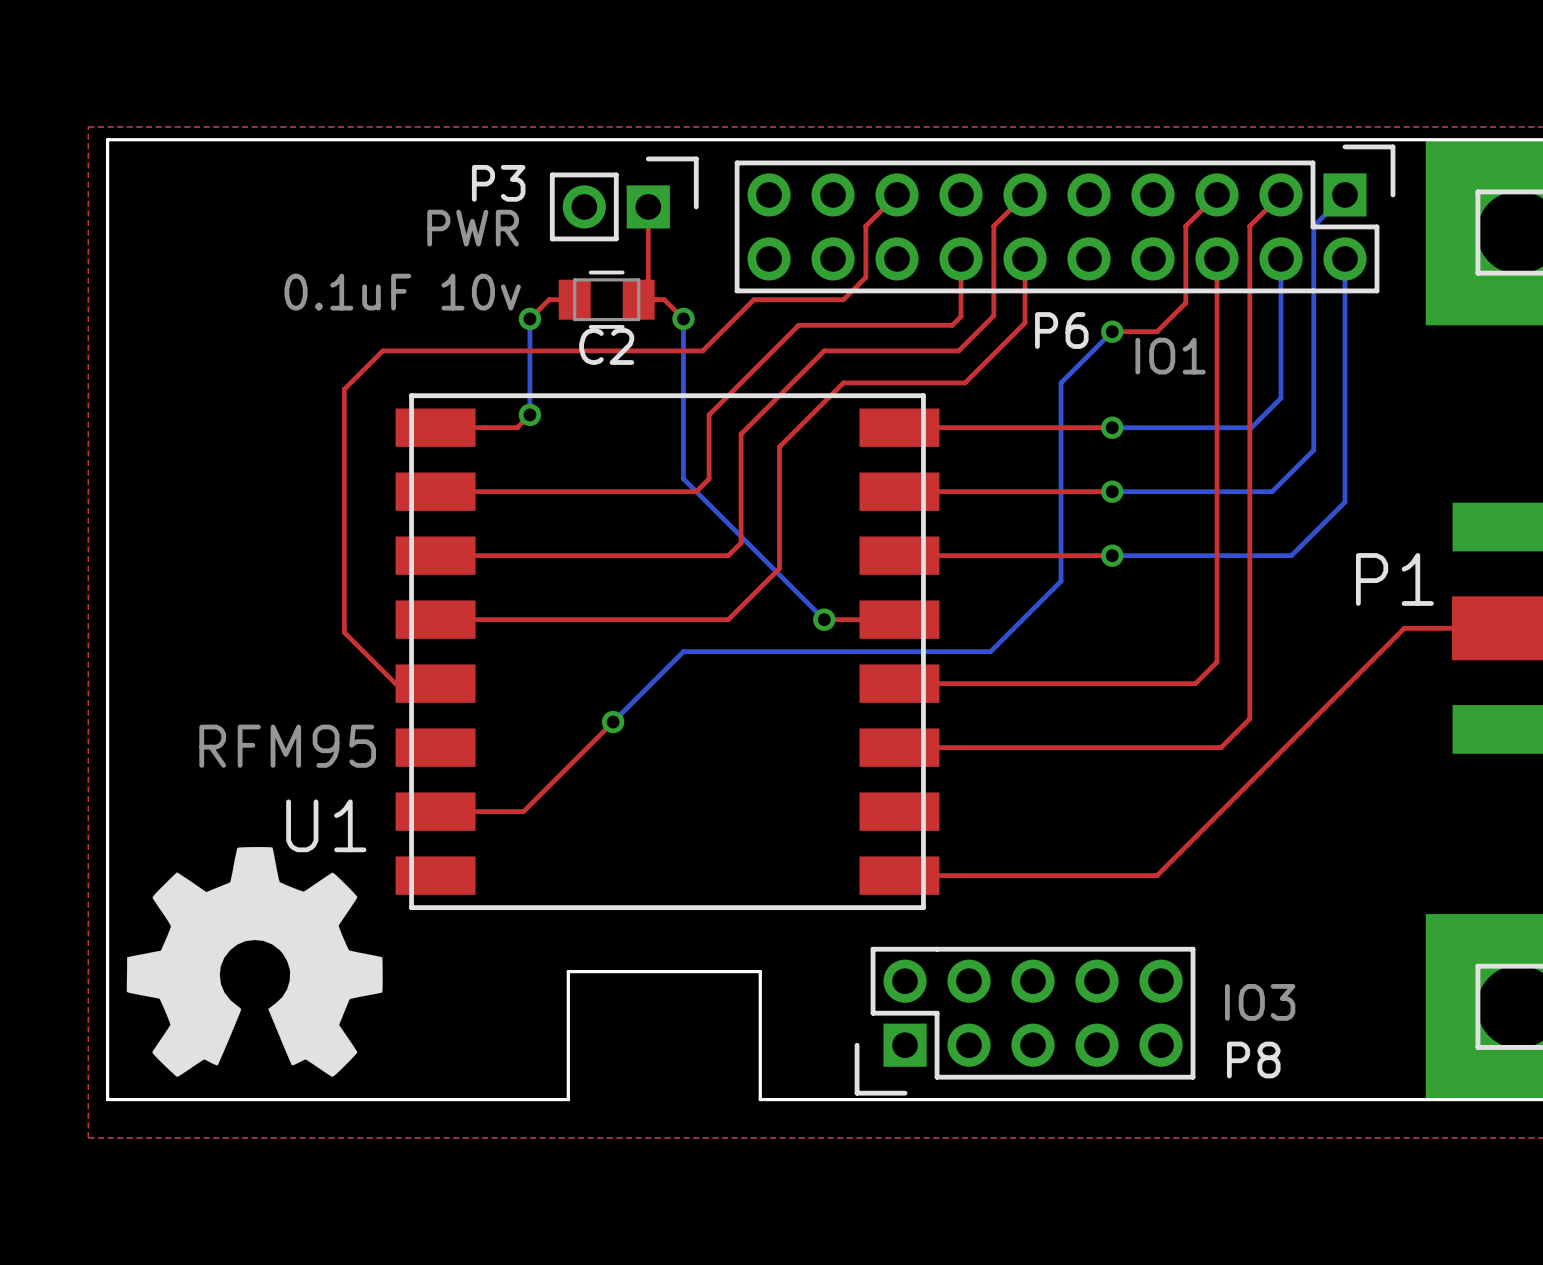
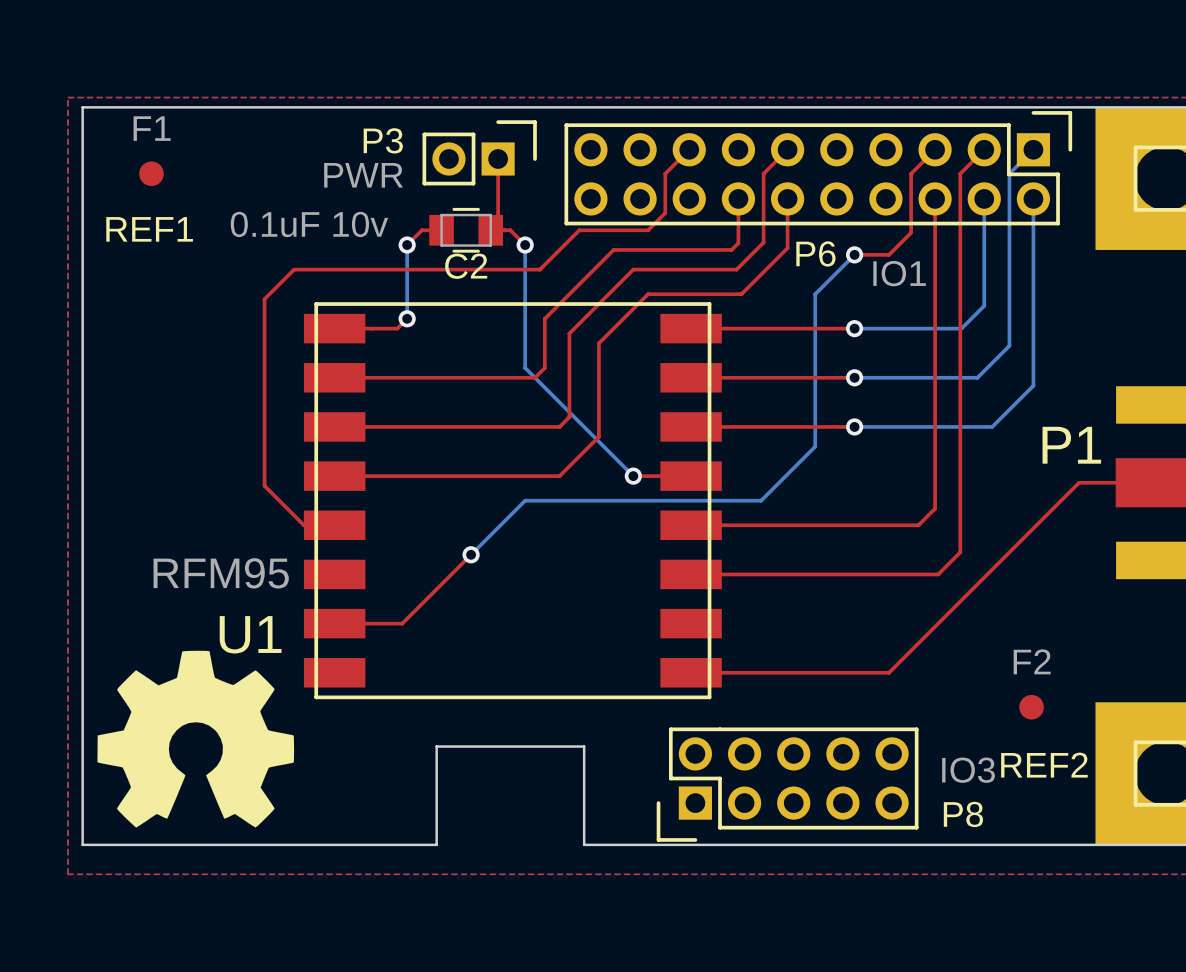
REF1: none -> F1 (151, 173)
REF2: none -> F2 (1031, 707)

